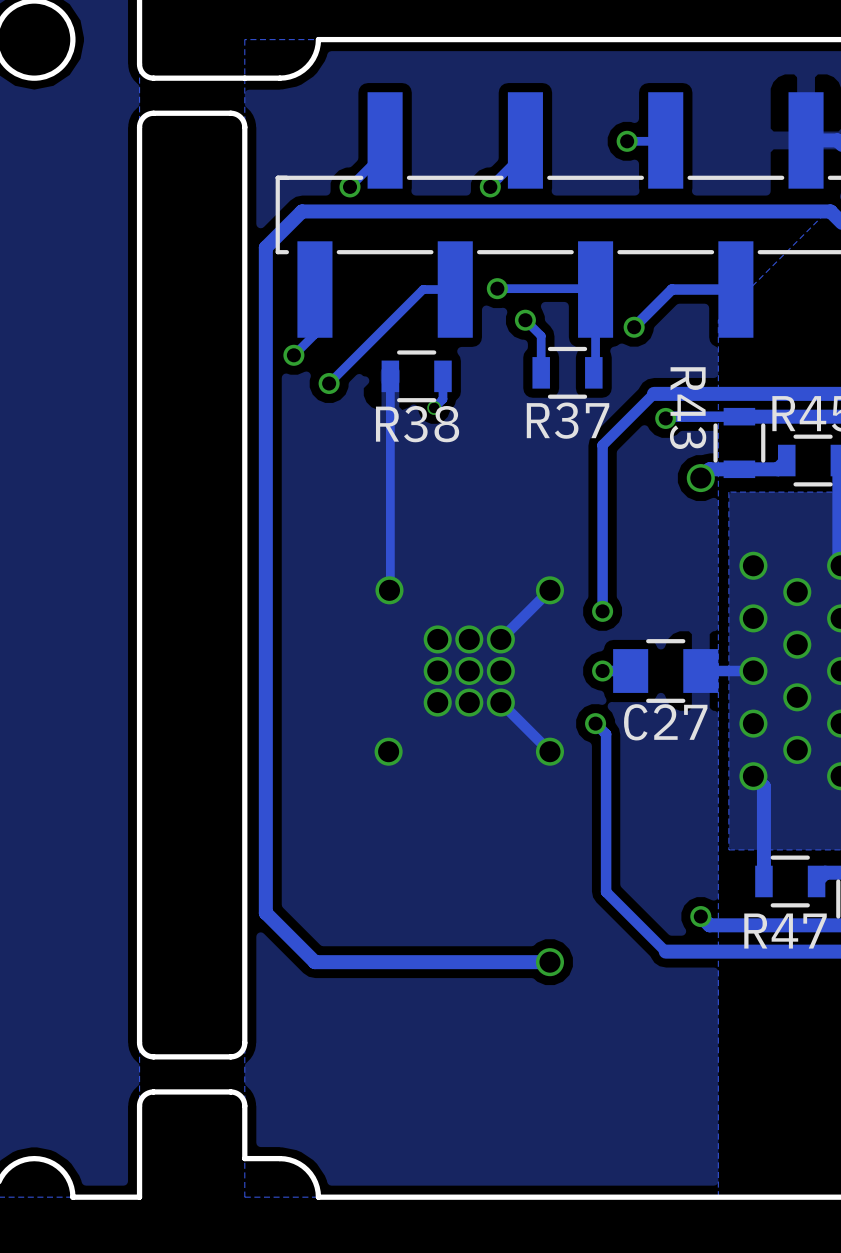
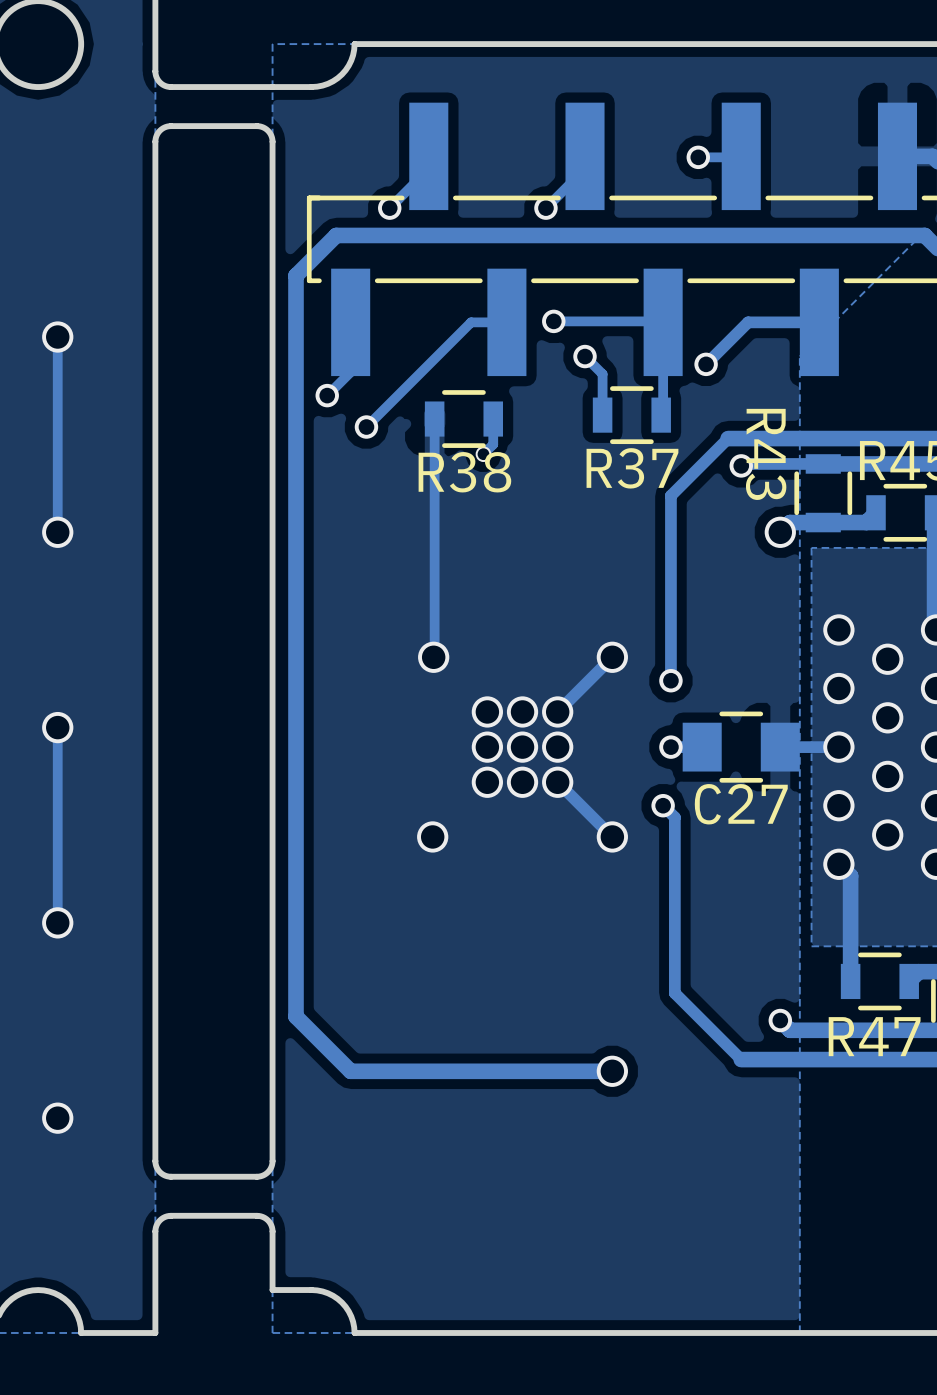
track: none -> (57, 337) (57, 532)
via: none -> (57, 337)
via: none -> (57, 532)
track: none -> (57, 727) (57, 922)
via: none -> (57, 727)
via: none -> (57, 922)
via: none -> (57, 1118)

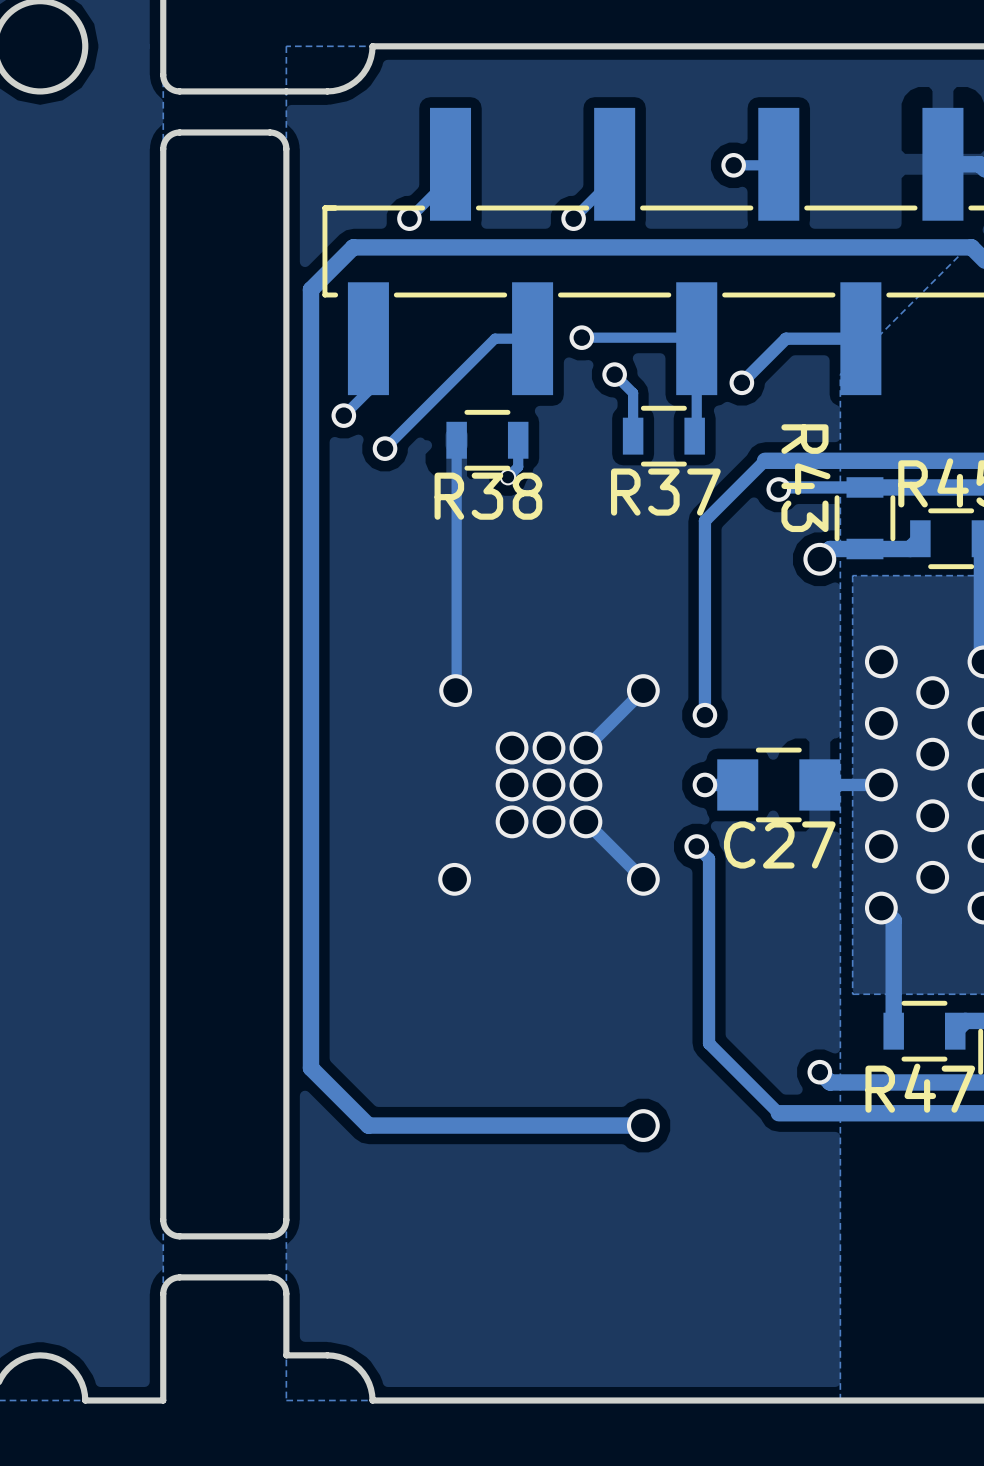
track: (57, 337) (57, 532) -> none
via: (57, 337) -> none
via: (57, 532) -> none
track: (57, 727) (57, 922) -> none
via: (57, 727) -> none
via: (57, 922) -> none
via: (57, 1118) -> none

